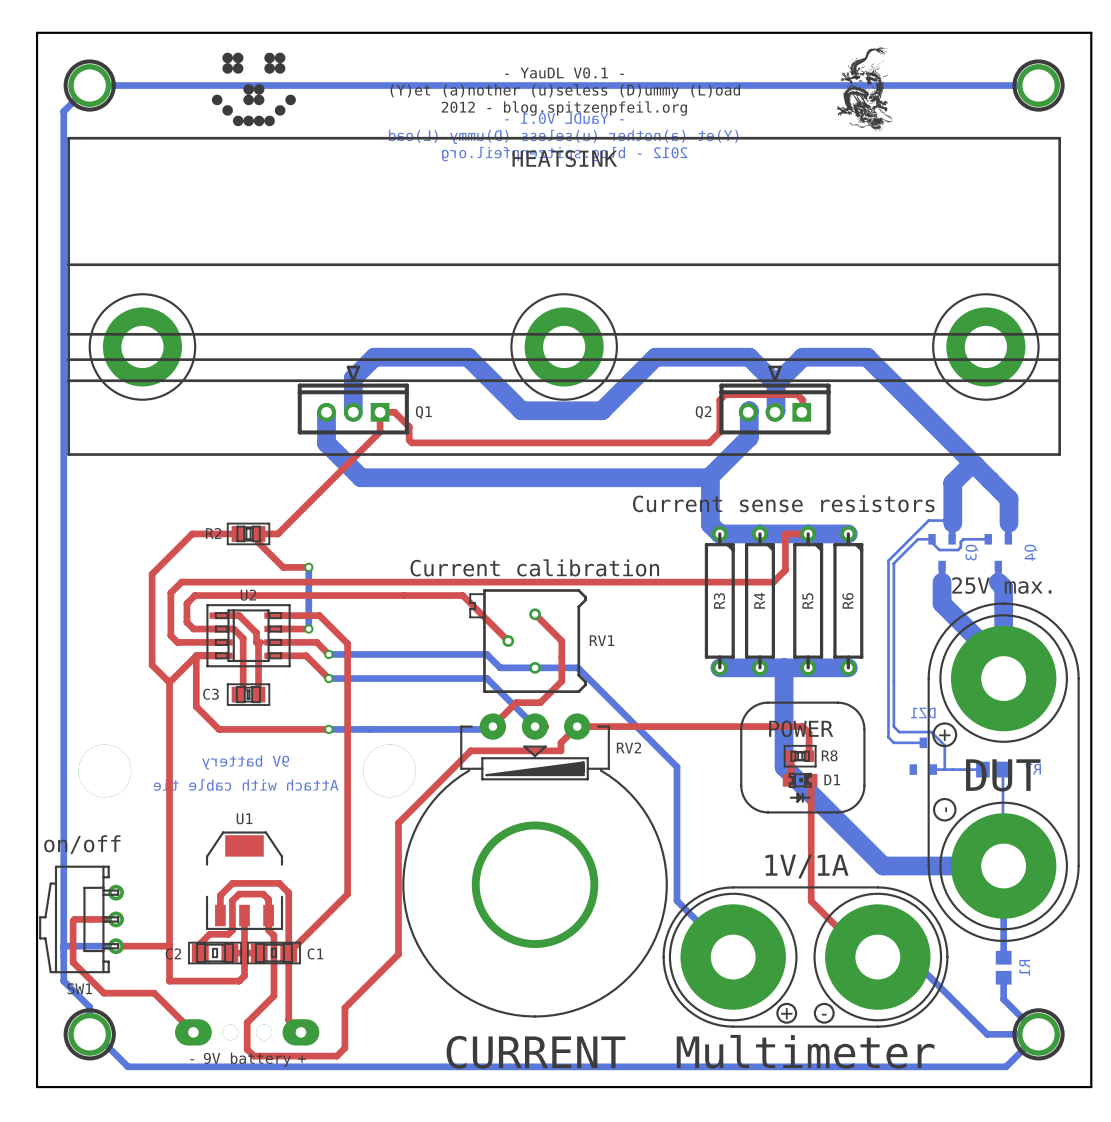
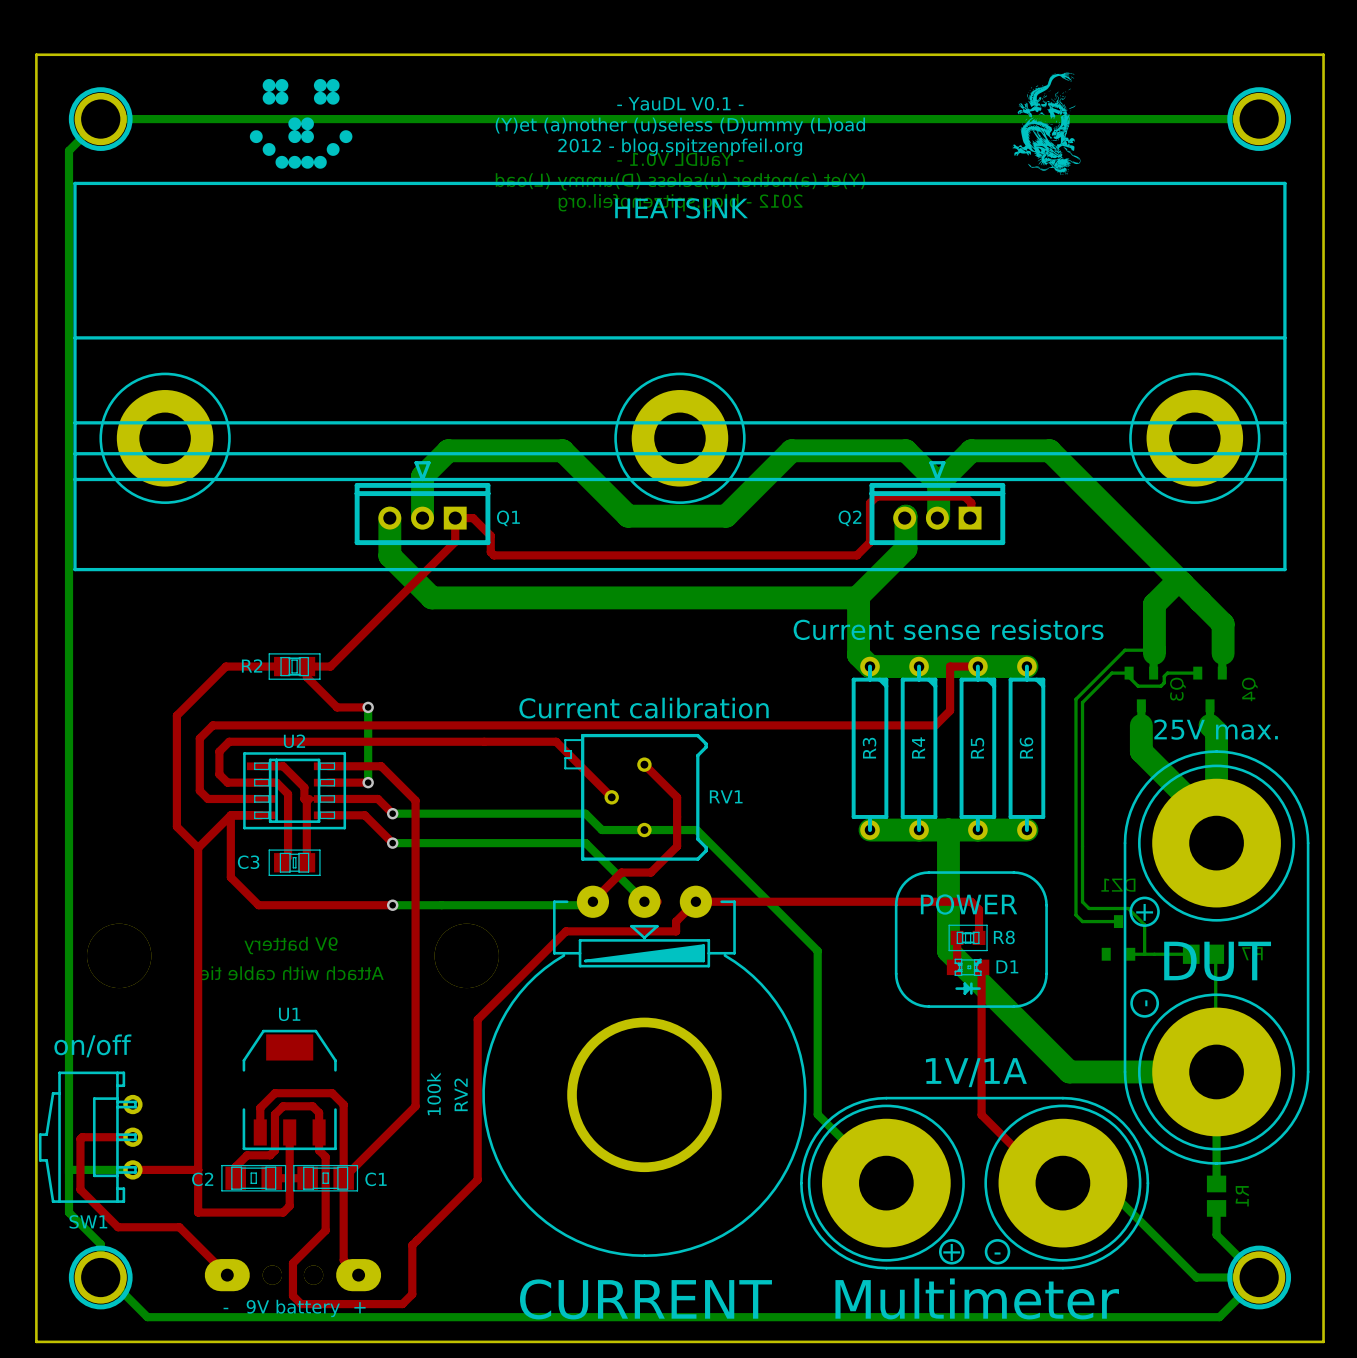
RV2 name rotation: 0° (628, 747) -> 90° counterclockwise (461, 1094)
RV2 name position: RV2 (628, 747) -> RV2 (461, 1094)
RV2 value: none -> 100k (433, 1093)

